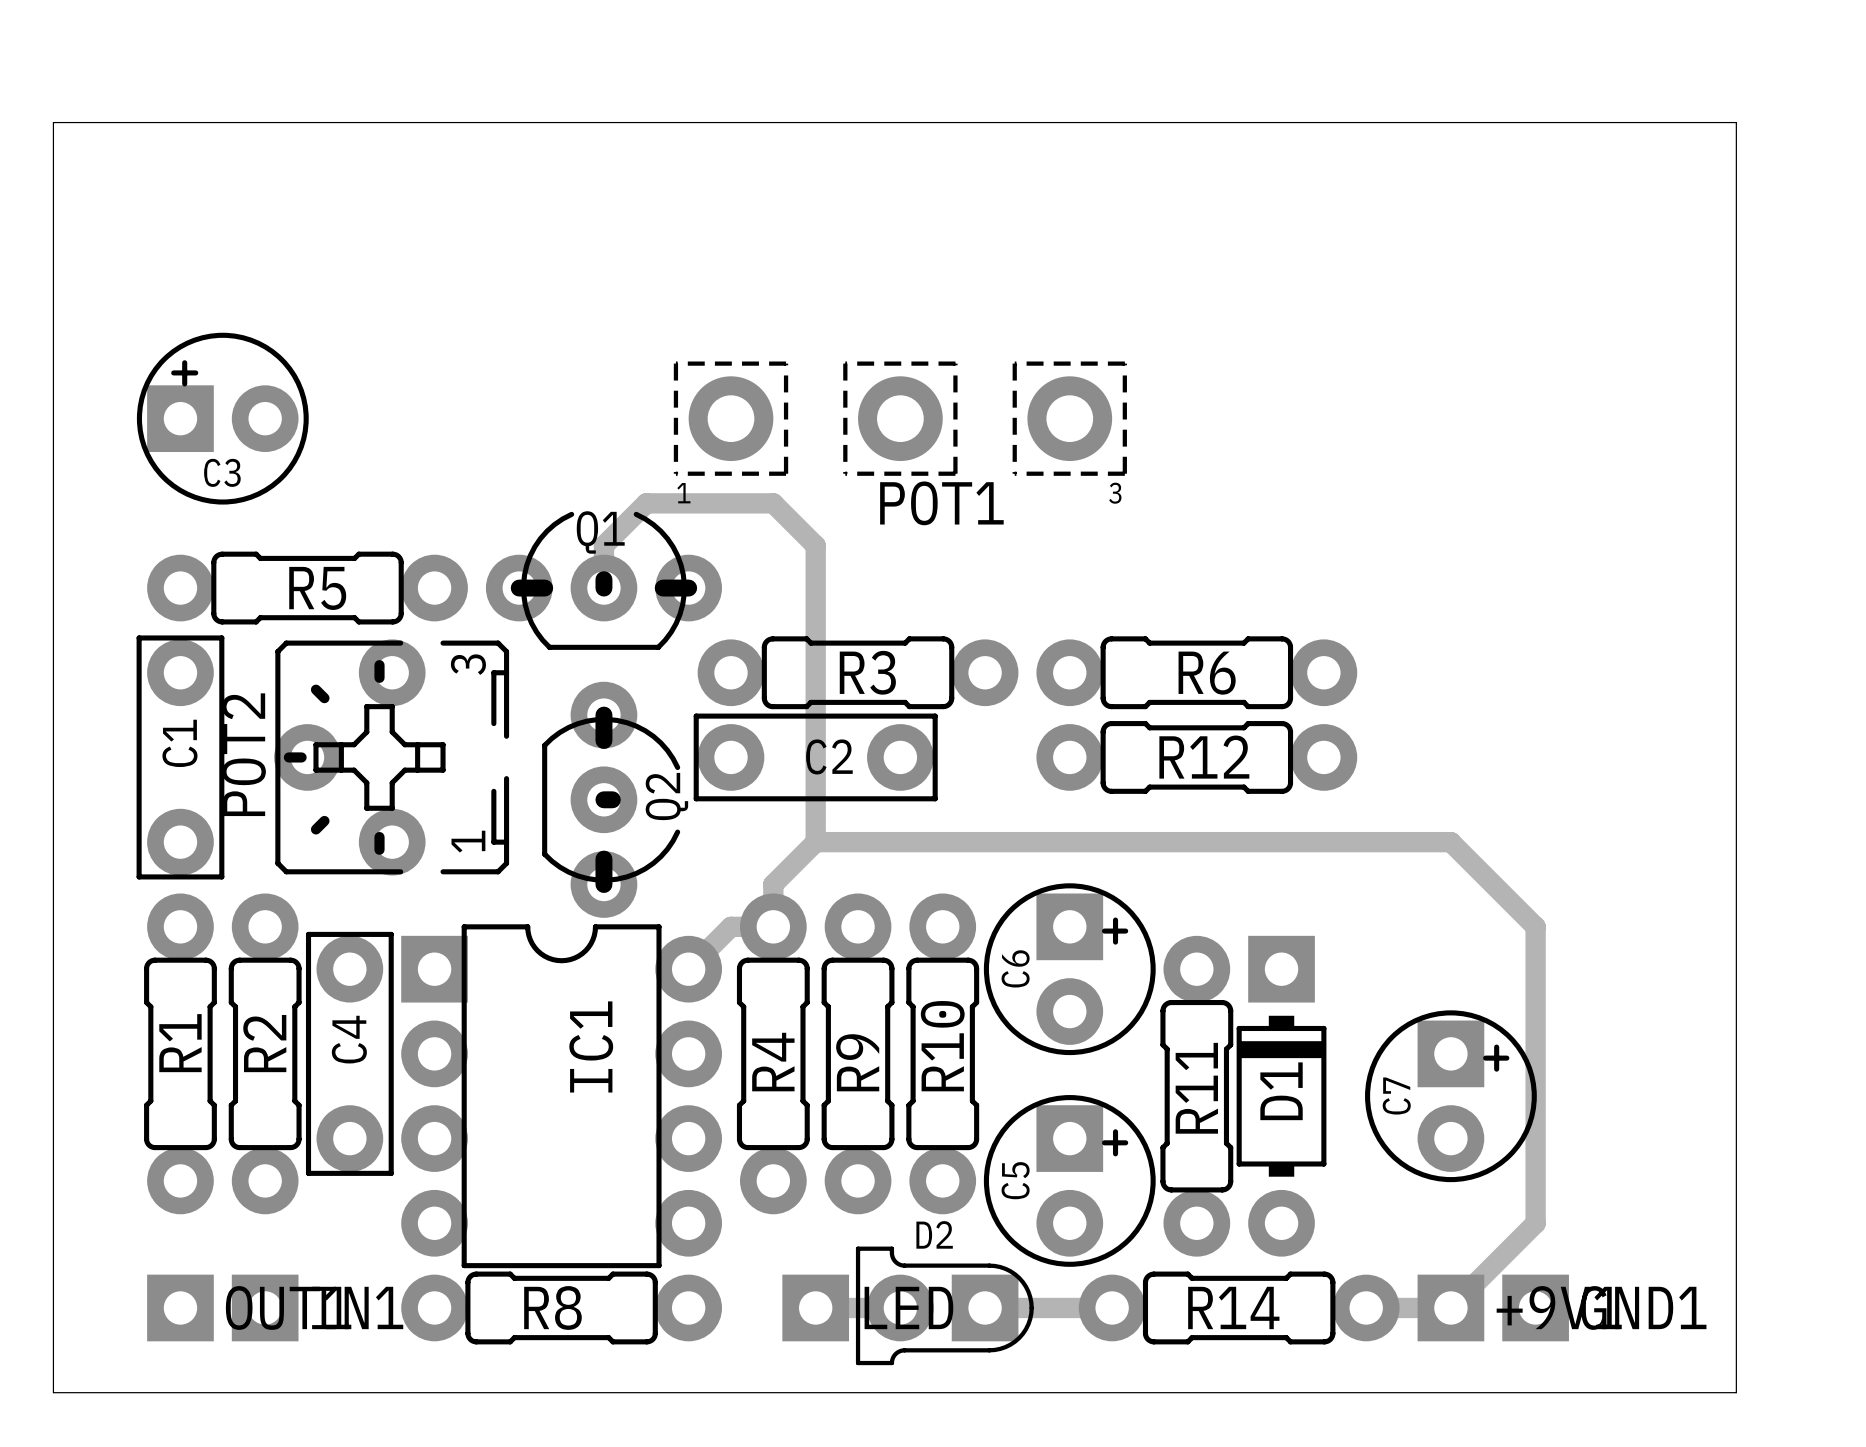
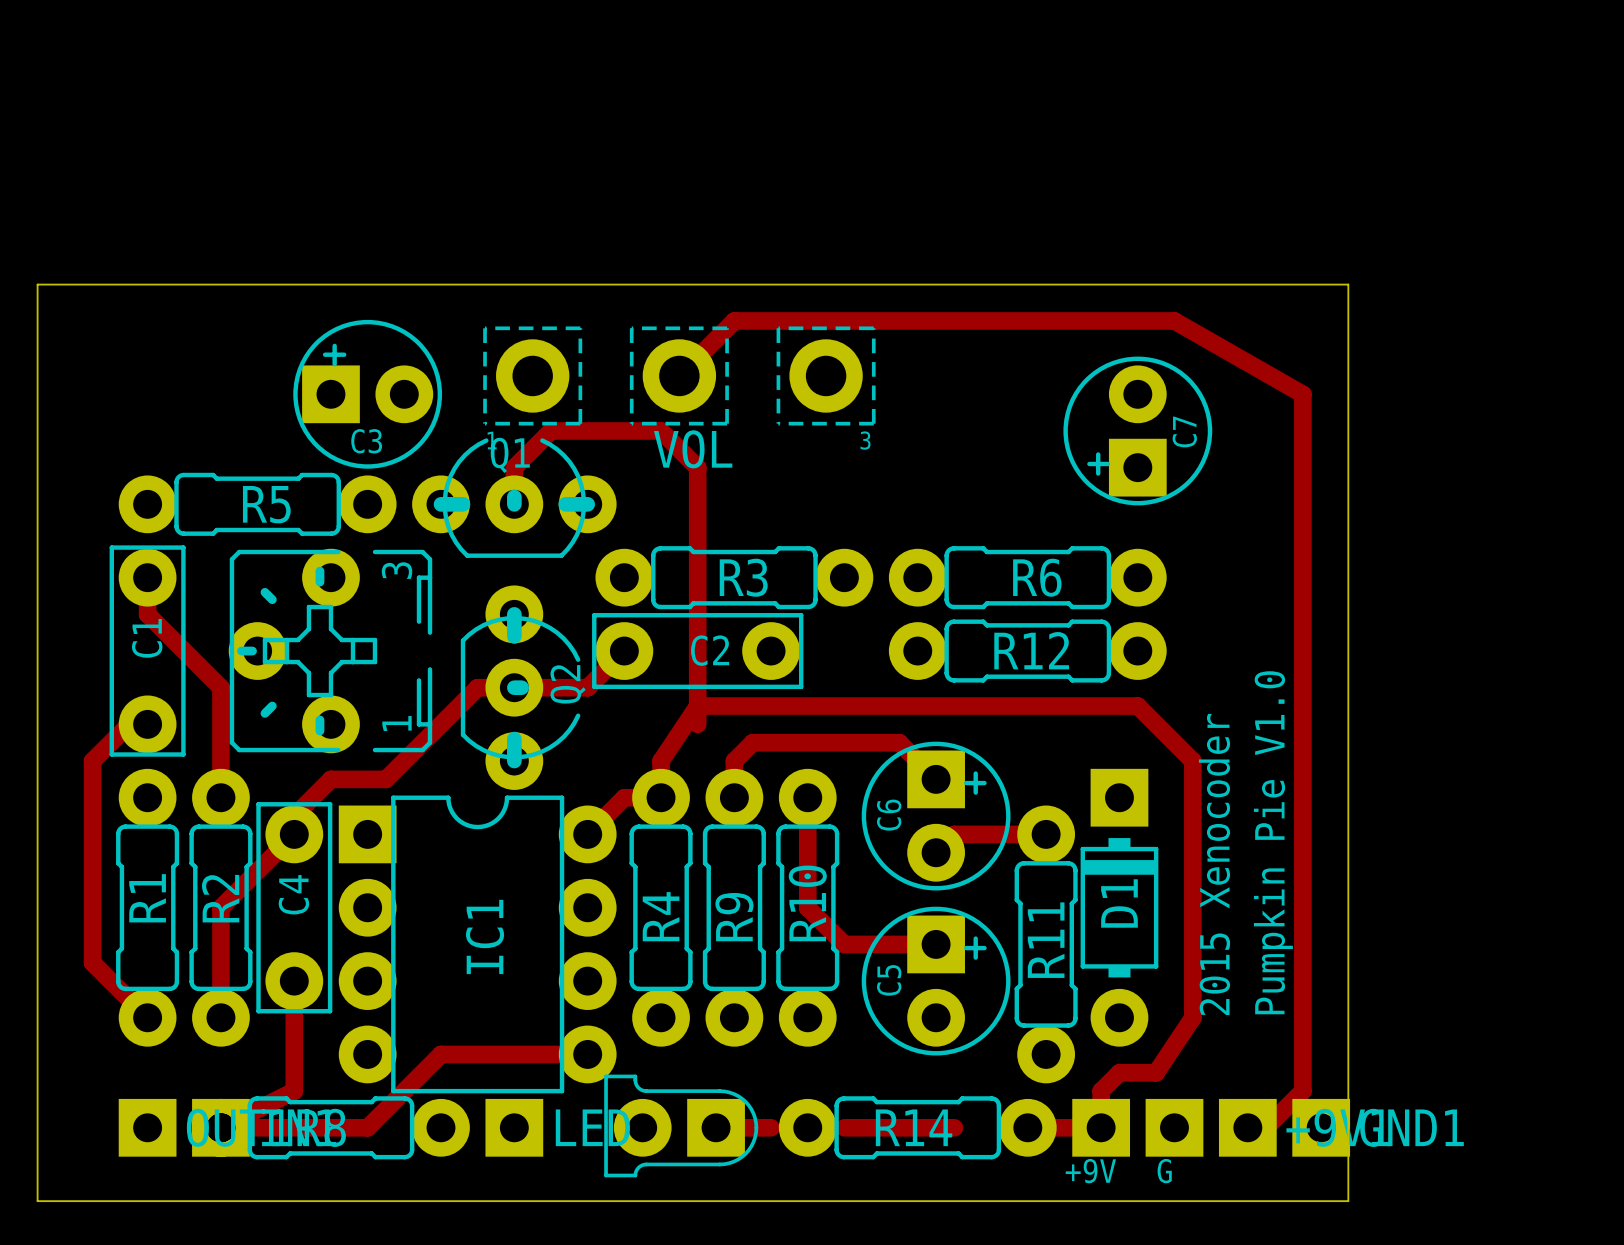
board edge: (53, 334) (53, 122) (1736, 122) (1736, 1392) (1566, 1392) -> (37, 284) (1348, 284) (1348, 1201)
C3 position: (222, 418) -> (367, 394)
POT1: (900, 418) -> none
track: none -> (679, 375) (734, 320) (1174, 320) (1302, 394) (1302, 1091) (1266, 1127) (1247, 1127)
VOL: none -> (679, 375)
track: none -> (147, 577) (147, 614) (220, 687) (220, 797)
POT2 name: POT2 (243, 754) -> none
track: none -> (624, 651) (587, 687) (477, 687) (385, 779) (330, 779) (294, 816) (294, 834) (220, 907) (220, 1017)
track: none -> (147, 724) (129, 724) (92, 761) (92, 962) (147, 1017)
track: (773, 884) (815, 842) (1450, 842) (1535, 926) (1535, 1223) (1450, 1307) (1366, 1307) -> (661, 761) (697, 706) (1137, 706) (1192, 761) (1192, 1017) (1156, 1072) (1119, 1072) (1101, 1091) (1101, 1127) (1027, 1127)
track: none -> (936, 779) (899, 742) (752, 742) (734, 761) (734, 797)
track: none -> (807, 797) (807, 907) (844, 944) (936, 944)
C6 position: (1069, 969) -> (936, 816)
track: none -> (1046, 834) (954, 834) (936, 852)
text: none -> Pumpkin Pie V1.0 (1273, 842)
text: none -> 2015 Xenocoder (1214, 864)
IC1 name position: IC1 (591, 1046) -> IC1 (485, 936)
R11 position: (1196, 1096) -> (1046, 944)
D1 position: (1281, 1096) -> (1119, 907)
C7 rotation: 0° (1450, 1096) -> 180° (1137, 430)
C7 position: (1450, 1096) -> (1137, 430)
track: none -> (294, 981) (294, 1091) (220, 1127) (367, 1127) (441, 1054) (587, 1054)
C5 position: (1069, 1180) -> (936, 981)
part: none -> (681, 1125)
D2: (944, 1305) -> none
R8 position: (561, 1307) -> (330, 1127)
LED position: (815, 1307) -> (514, 1127)
R14 position: (1239, 1307) -> (917, 1127)
+9V: none -> (1101, 1127)
G: none -> (1174, 1127)

